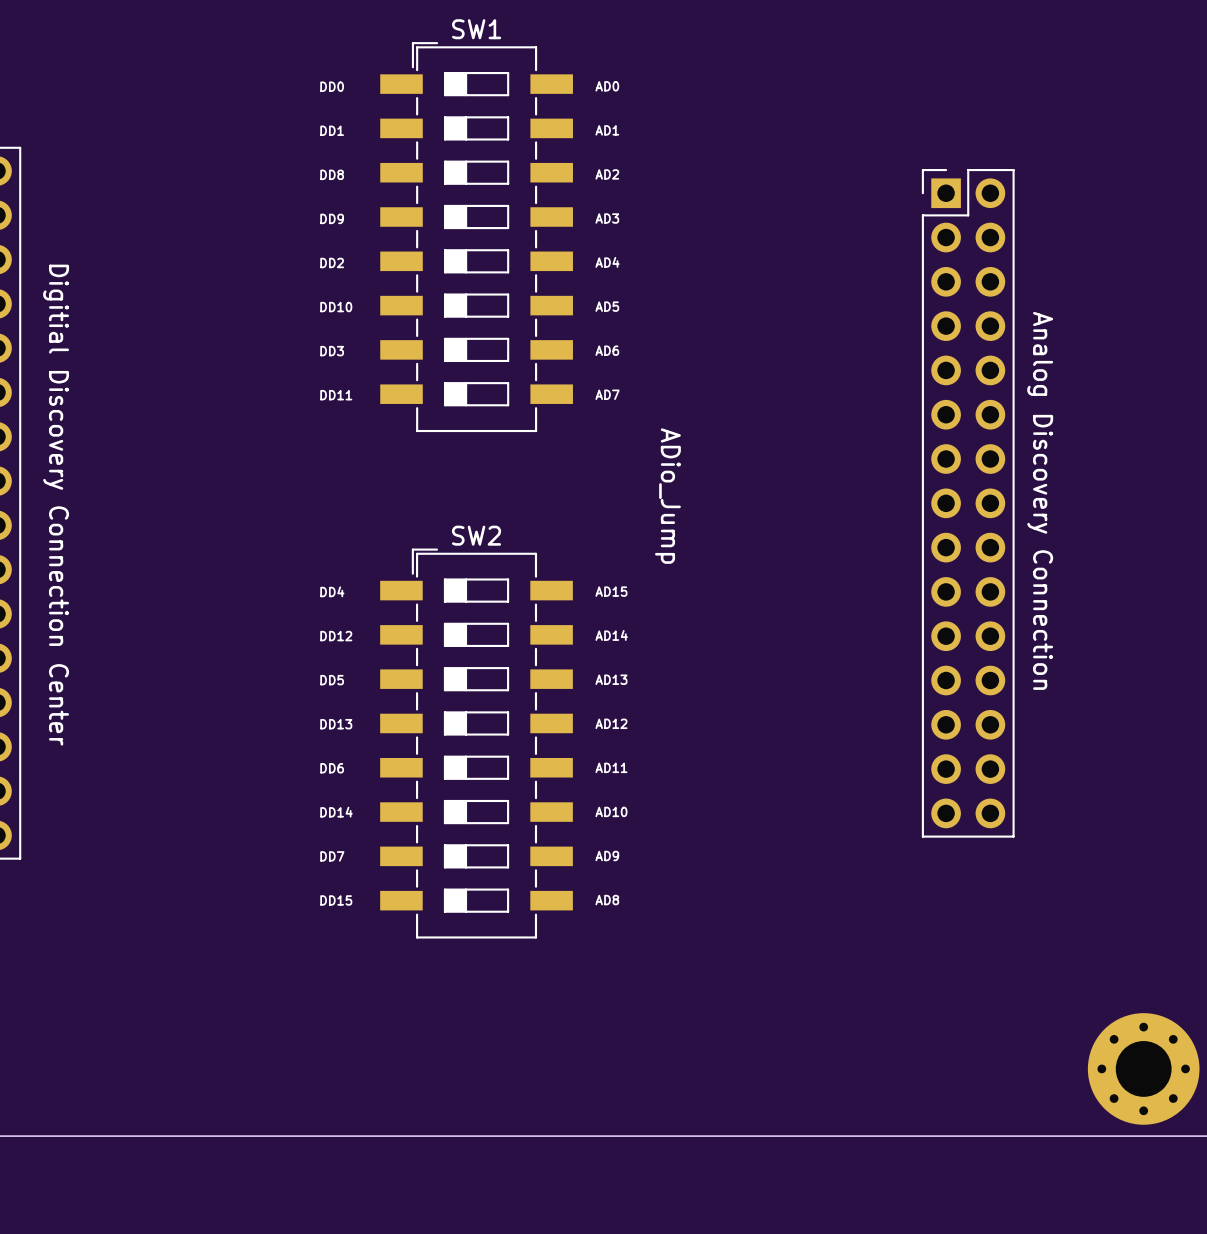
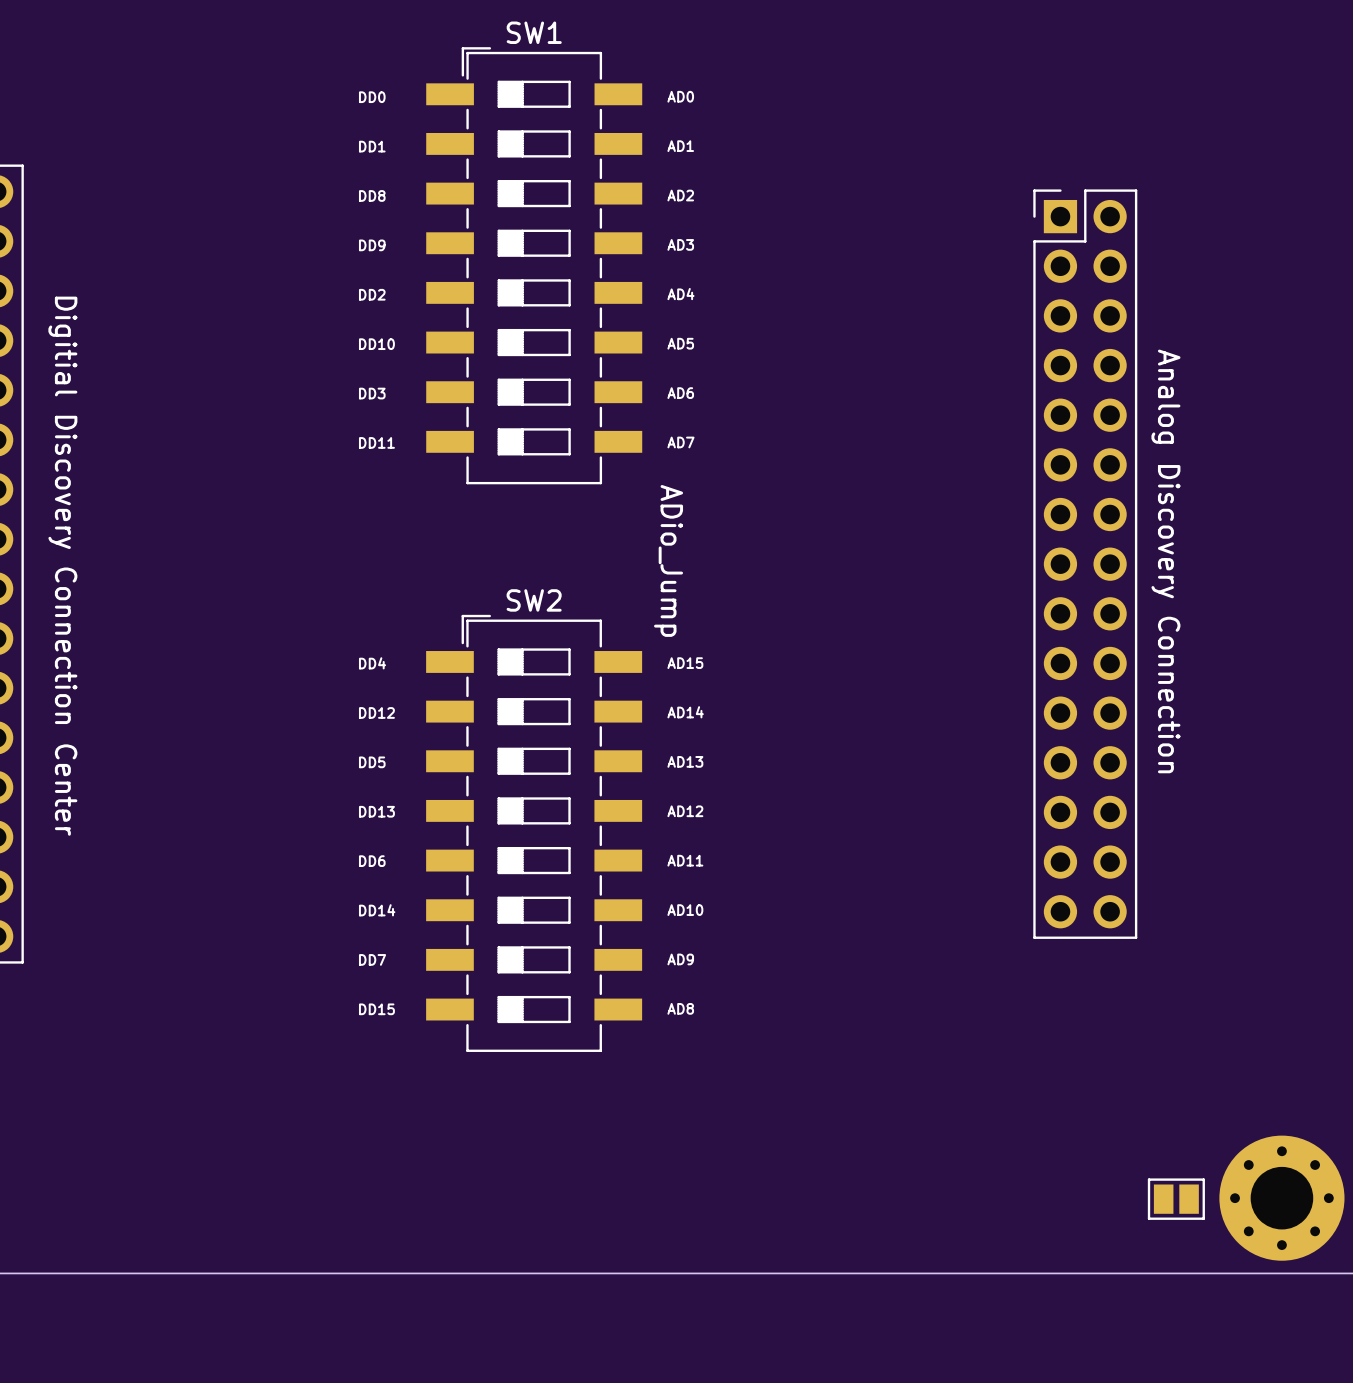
text position: ADio_Jump (667, 496) -> ADio_Jump (668, 560)
part: none -> (1176, 1199)

